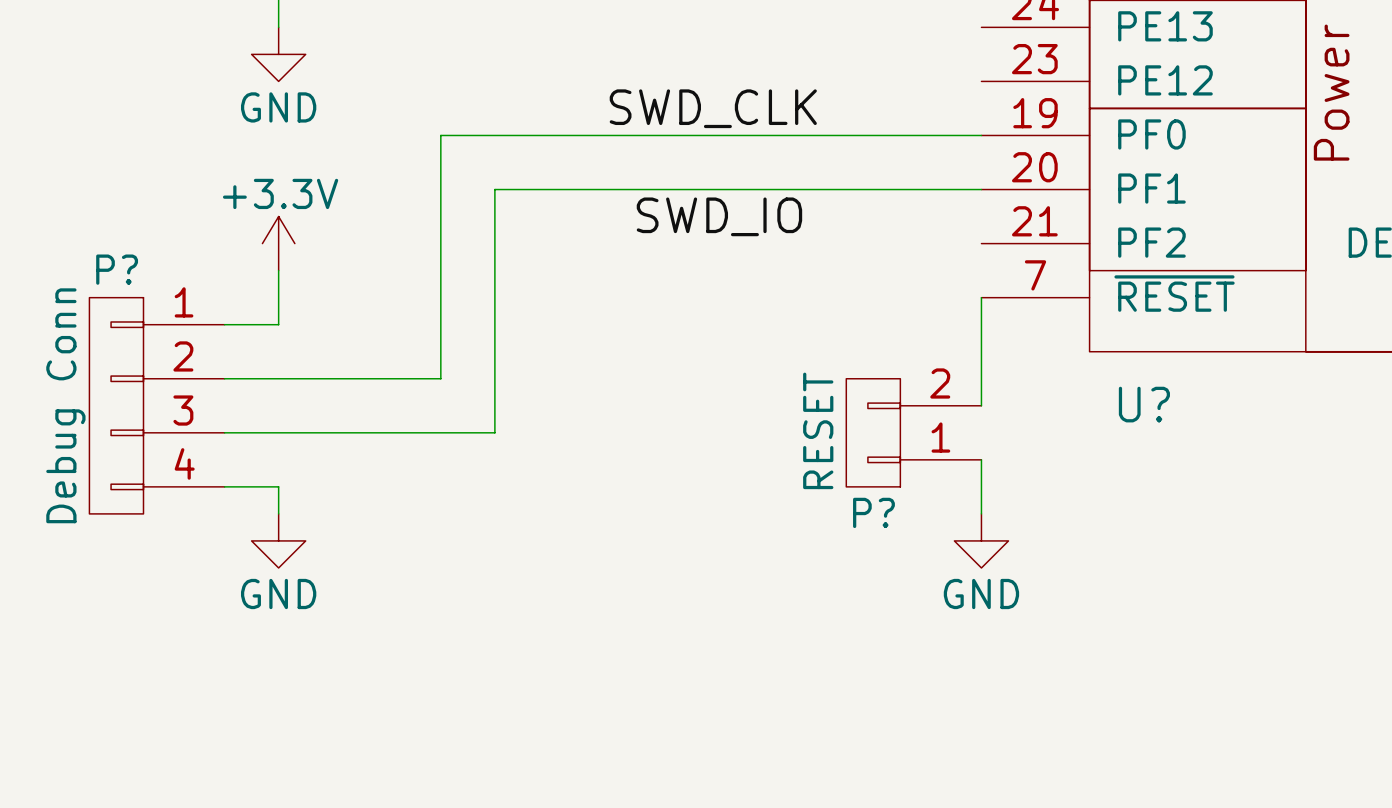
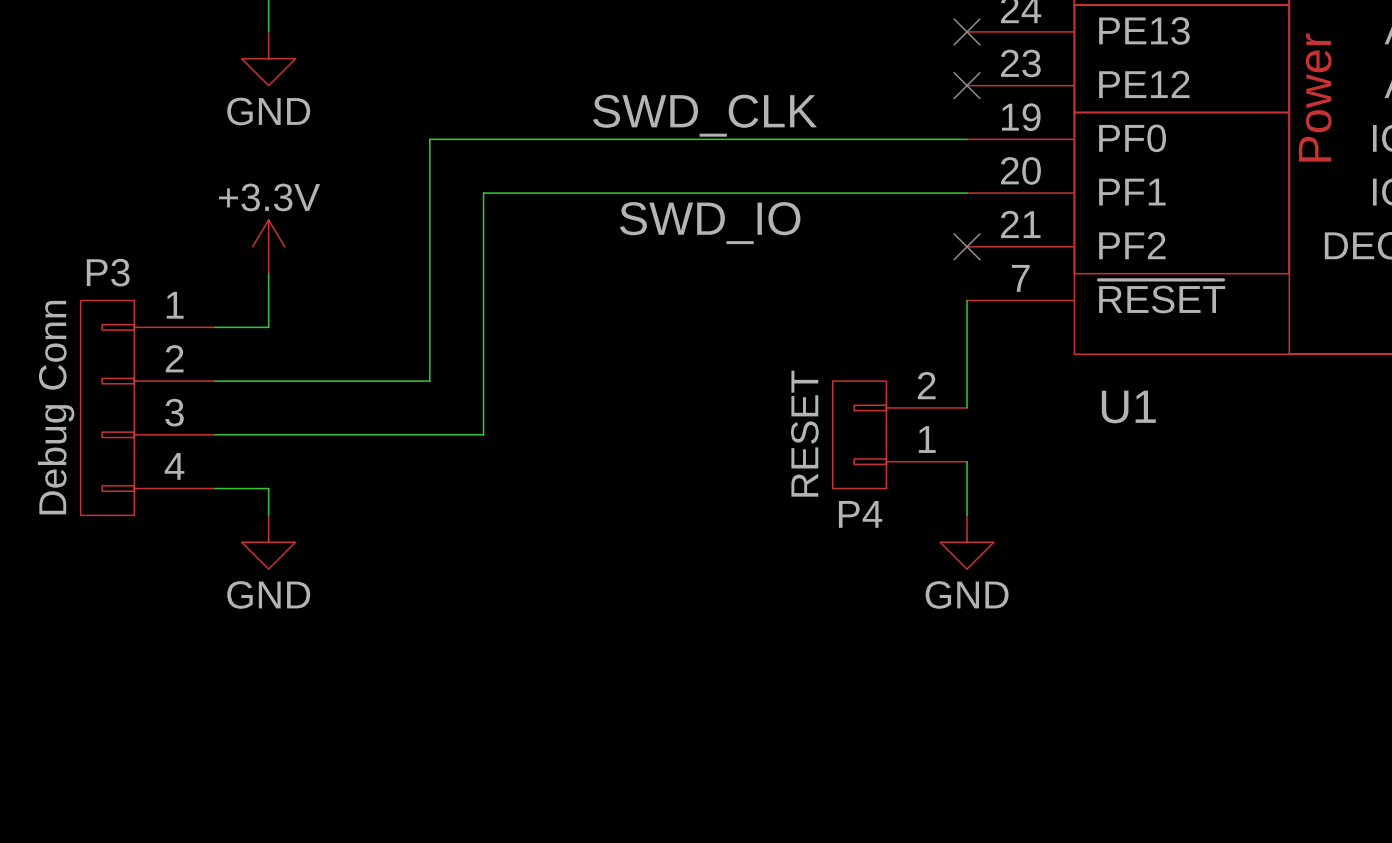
no-connect mark: none -> (967, 31)
no-connect mark: none -> (967, 85)
no-connect mark: none -> (967, 246)
P? name: P? (117, 269) -> P3 (108, 272)
U? name: U? (1144, 404) -> U1 (1128, 406)
P? name: P? (873, 512) -> P4 (860, 514)

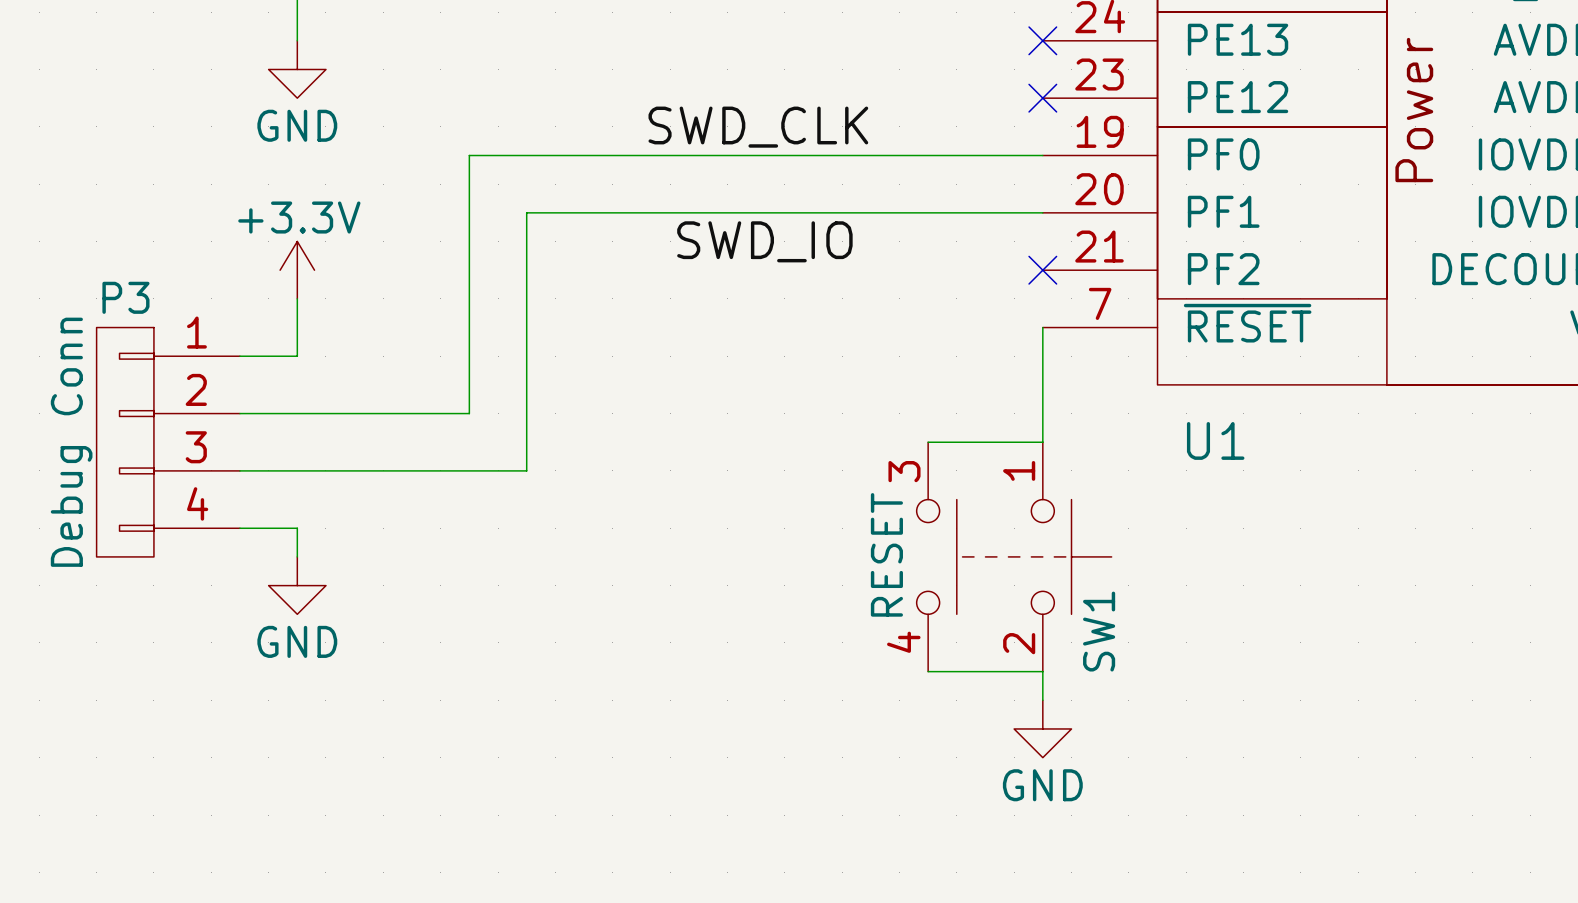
P4: RESET (899, 434) -> none
wire: (967, 461) (967, 515) -> none
SW1: none -> RESET (1014, 556)
power symbol position: GND (967, 542) -> GND (1042, 728)
wire: none -> (928, 671) (1042, 671) (1042, 700)

